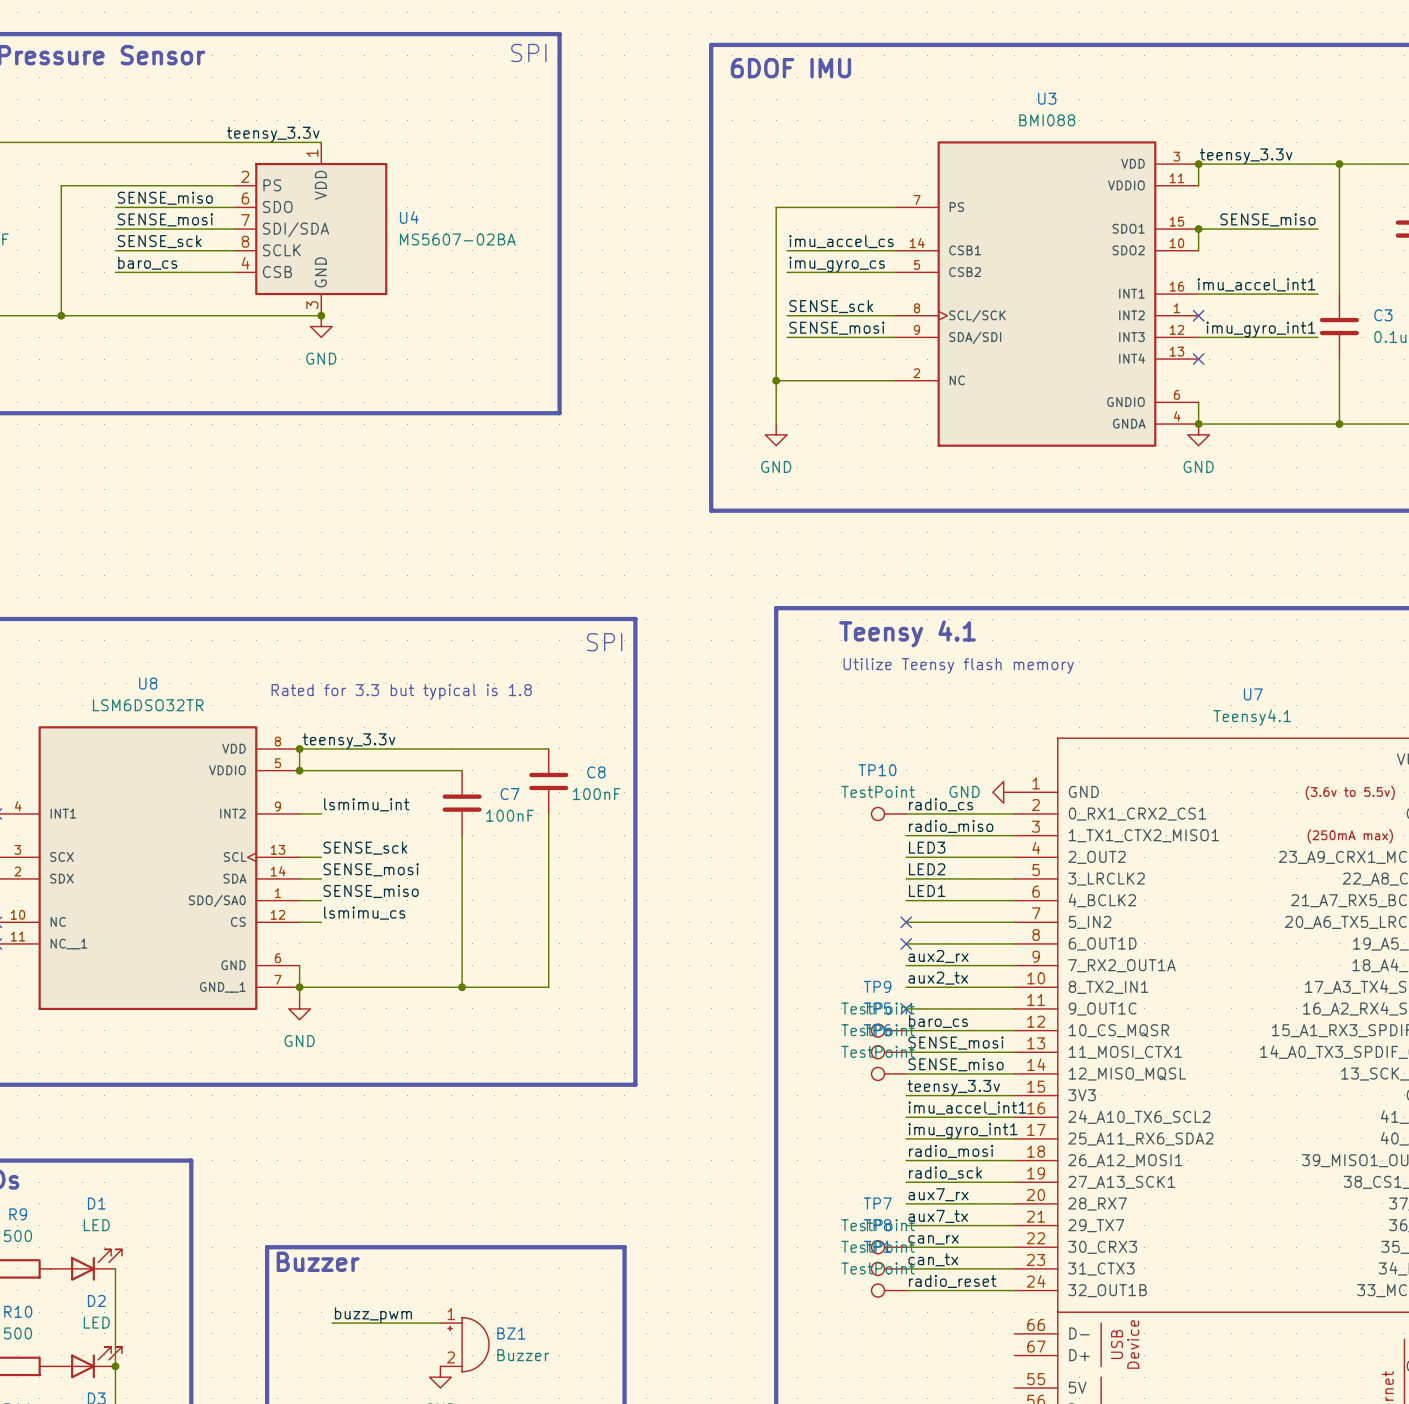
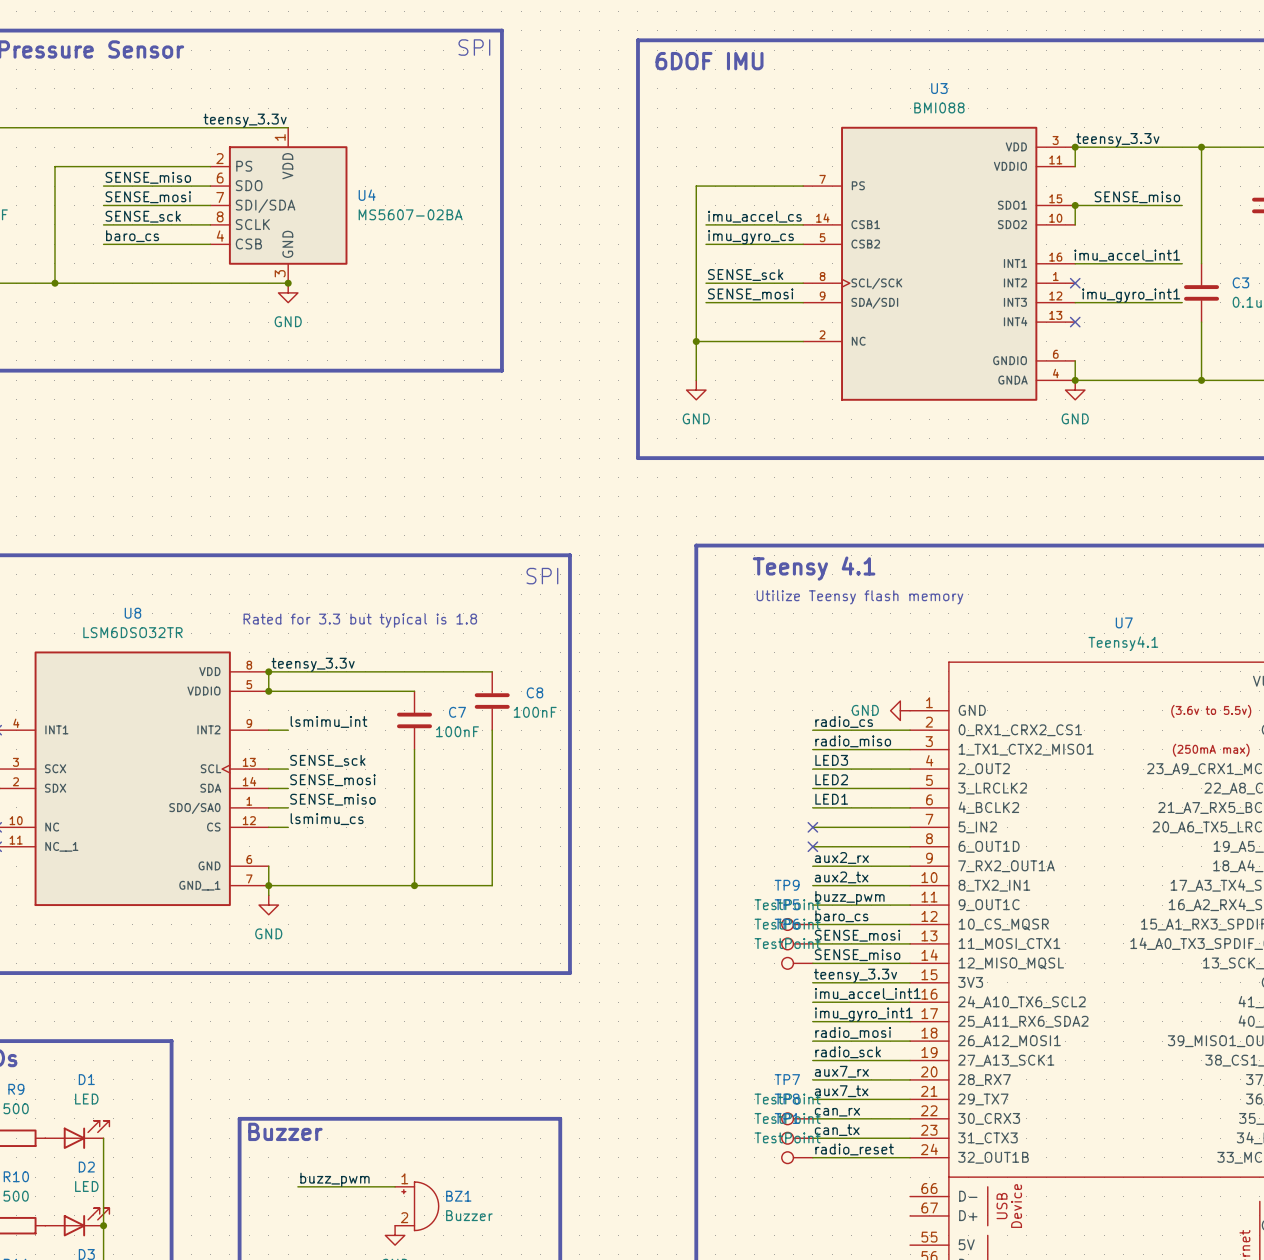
TP10: TestPoint (888, 813) -> none
label: none -> buzz_pwm (849, 898)
no-connect mark: (906, 1008) -> none

